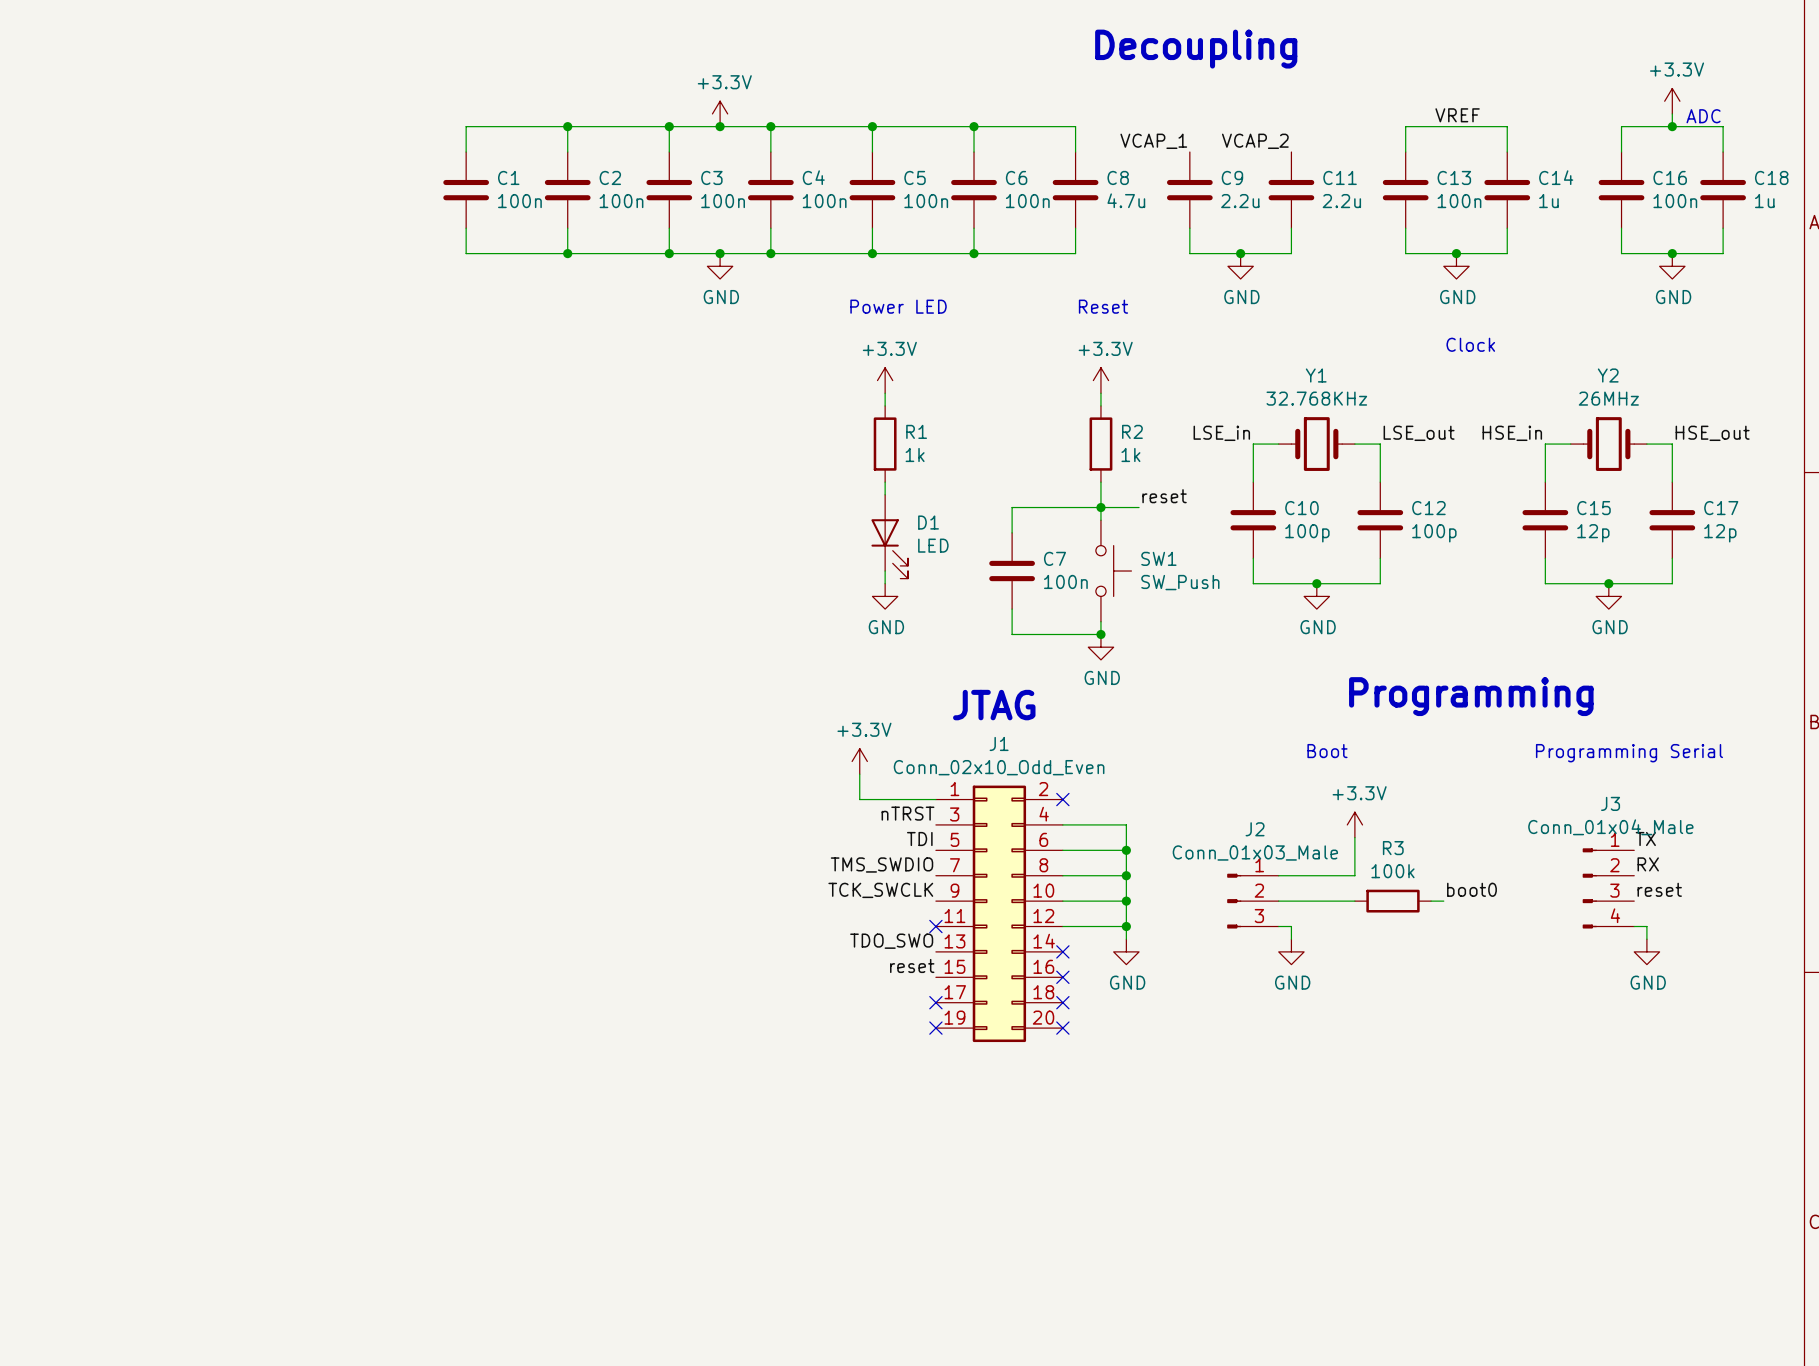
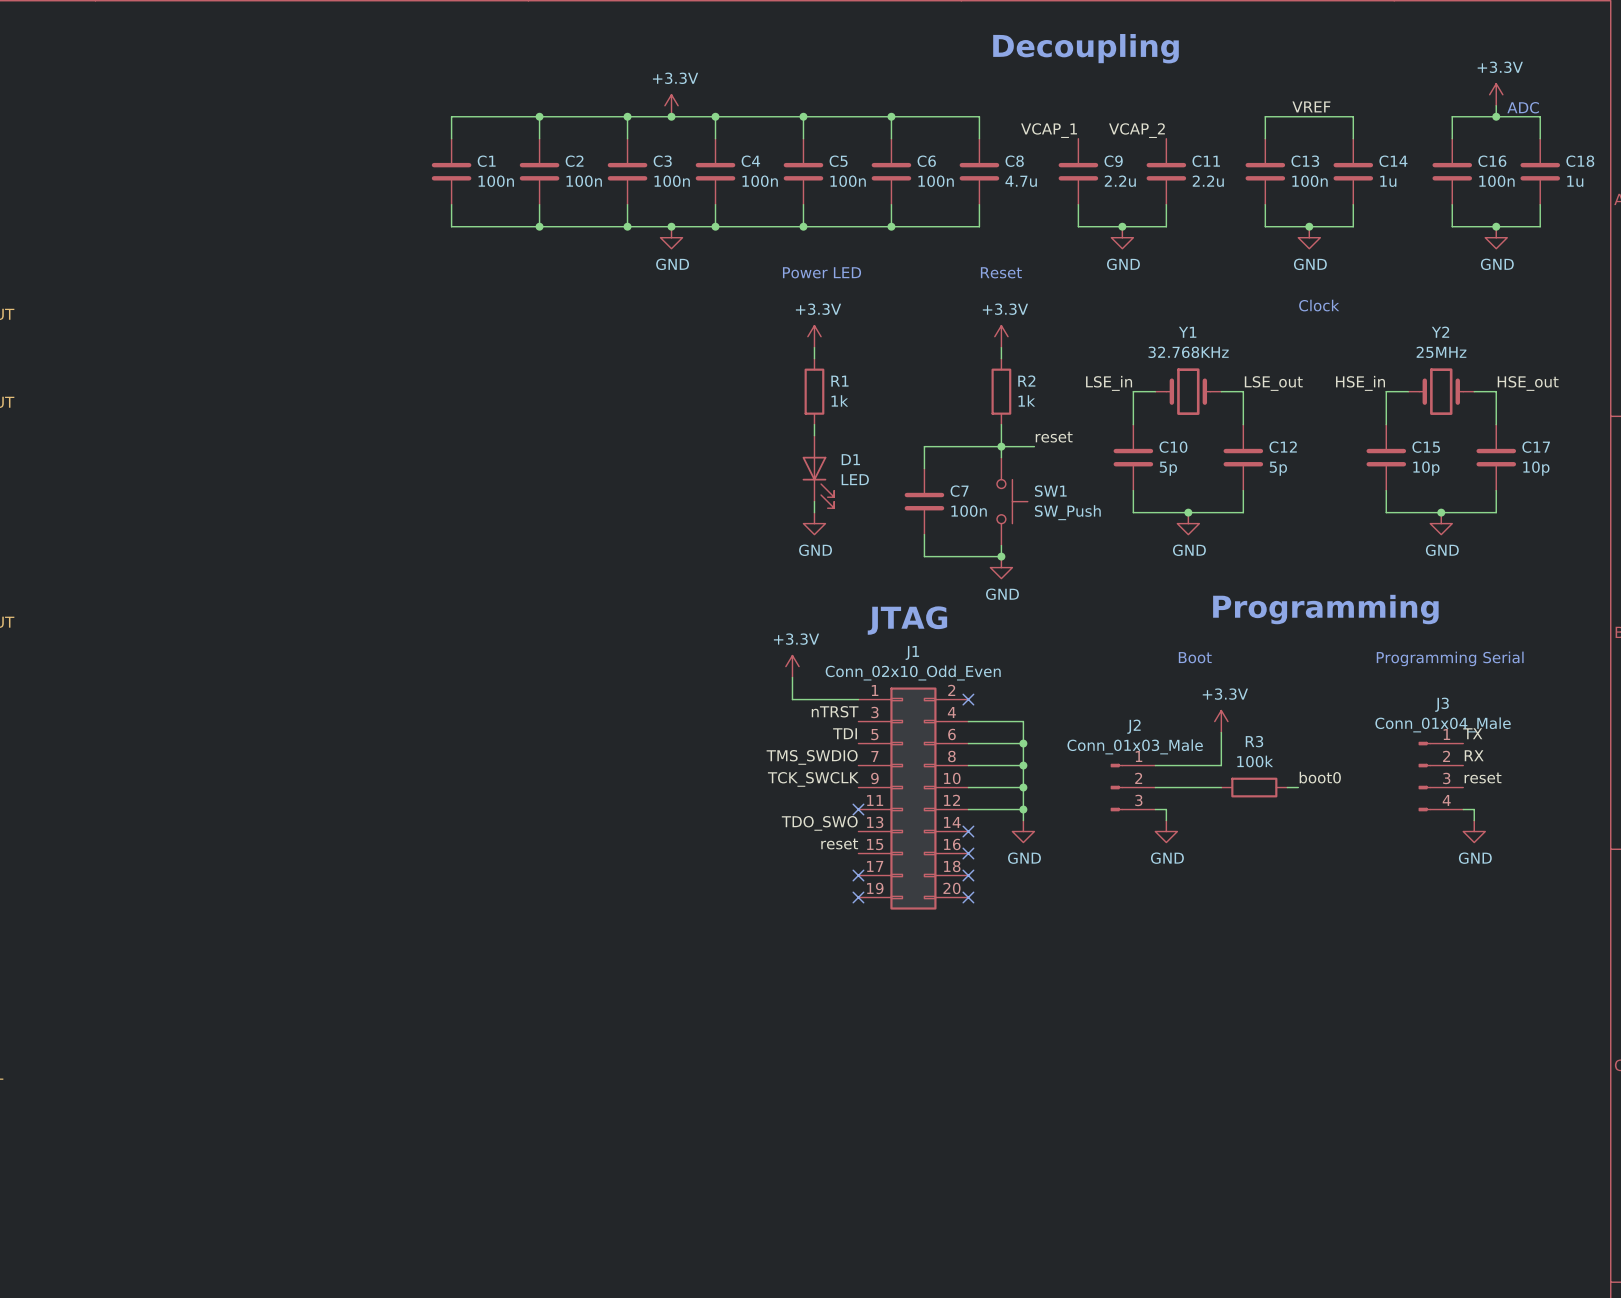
Y2 value: 26MHz (1608, 398) -> 25MHz (1441, 352)
C10 value: 100p (1307, 533) -> 5p (1168, 468)
C12 value: 100p (1434, 533) -> 5p (1278, 468)
C15 value: 12p (1593, 533) -> 10p (1426, 468)
C17 value: 12p (1720, 533) -> 10p (1536, 468)

